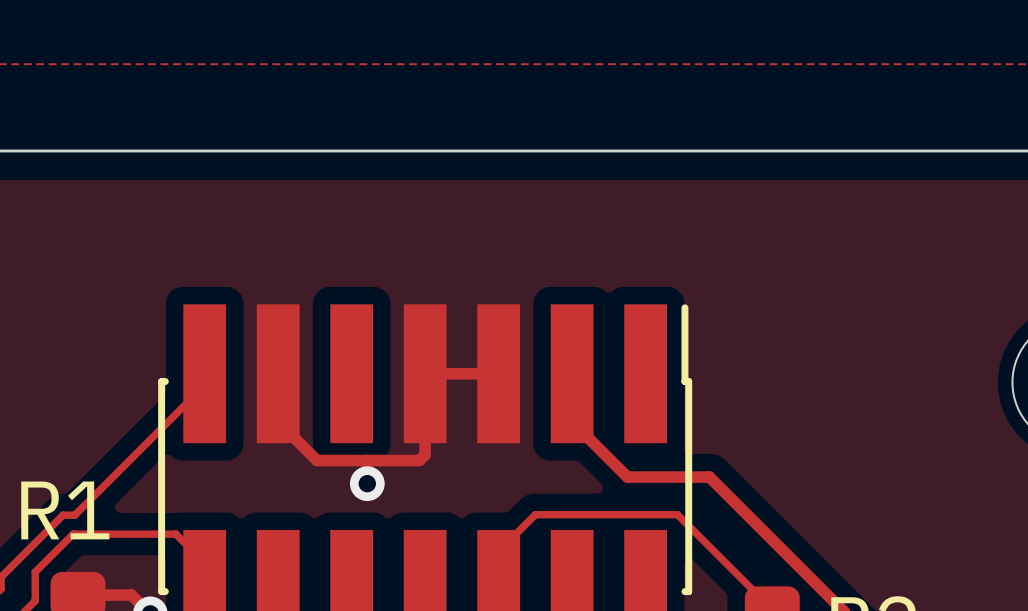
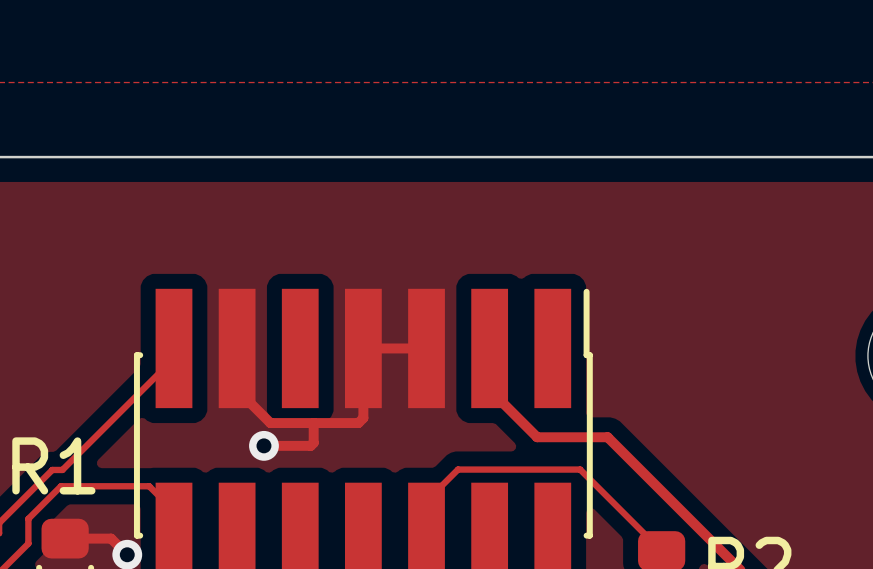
track: none -> (313, 442) (310, 445) (263, 445)
via position: (367, 483) -> (263, 445)

